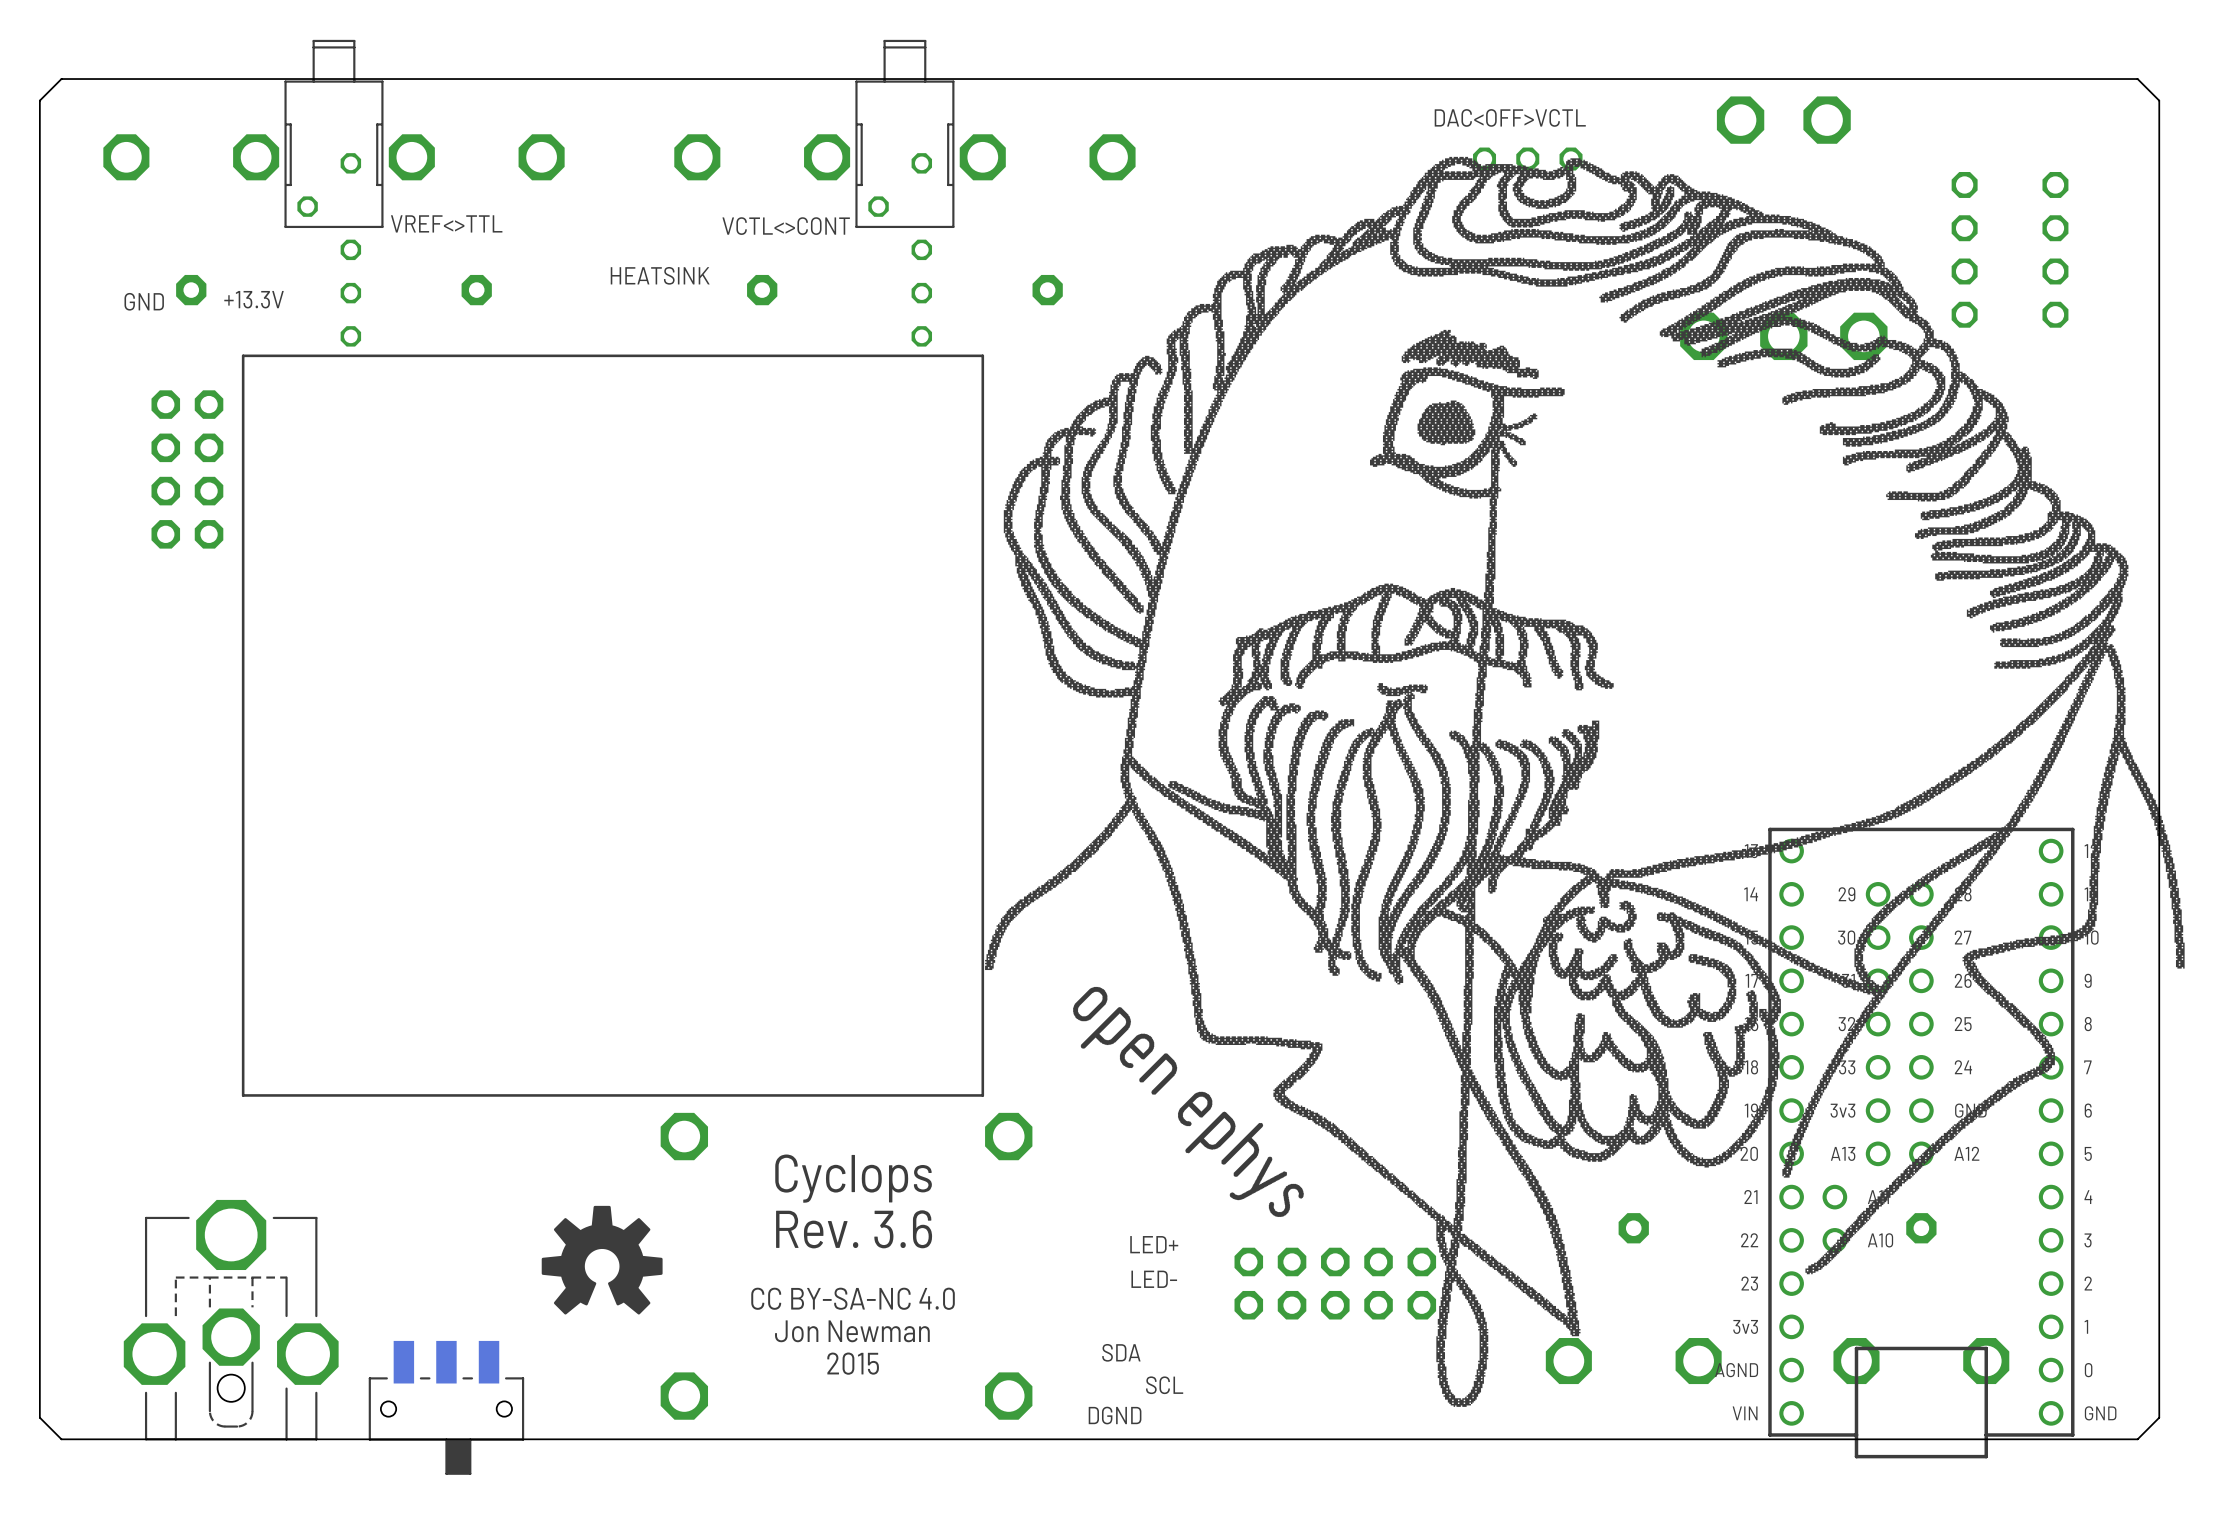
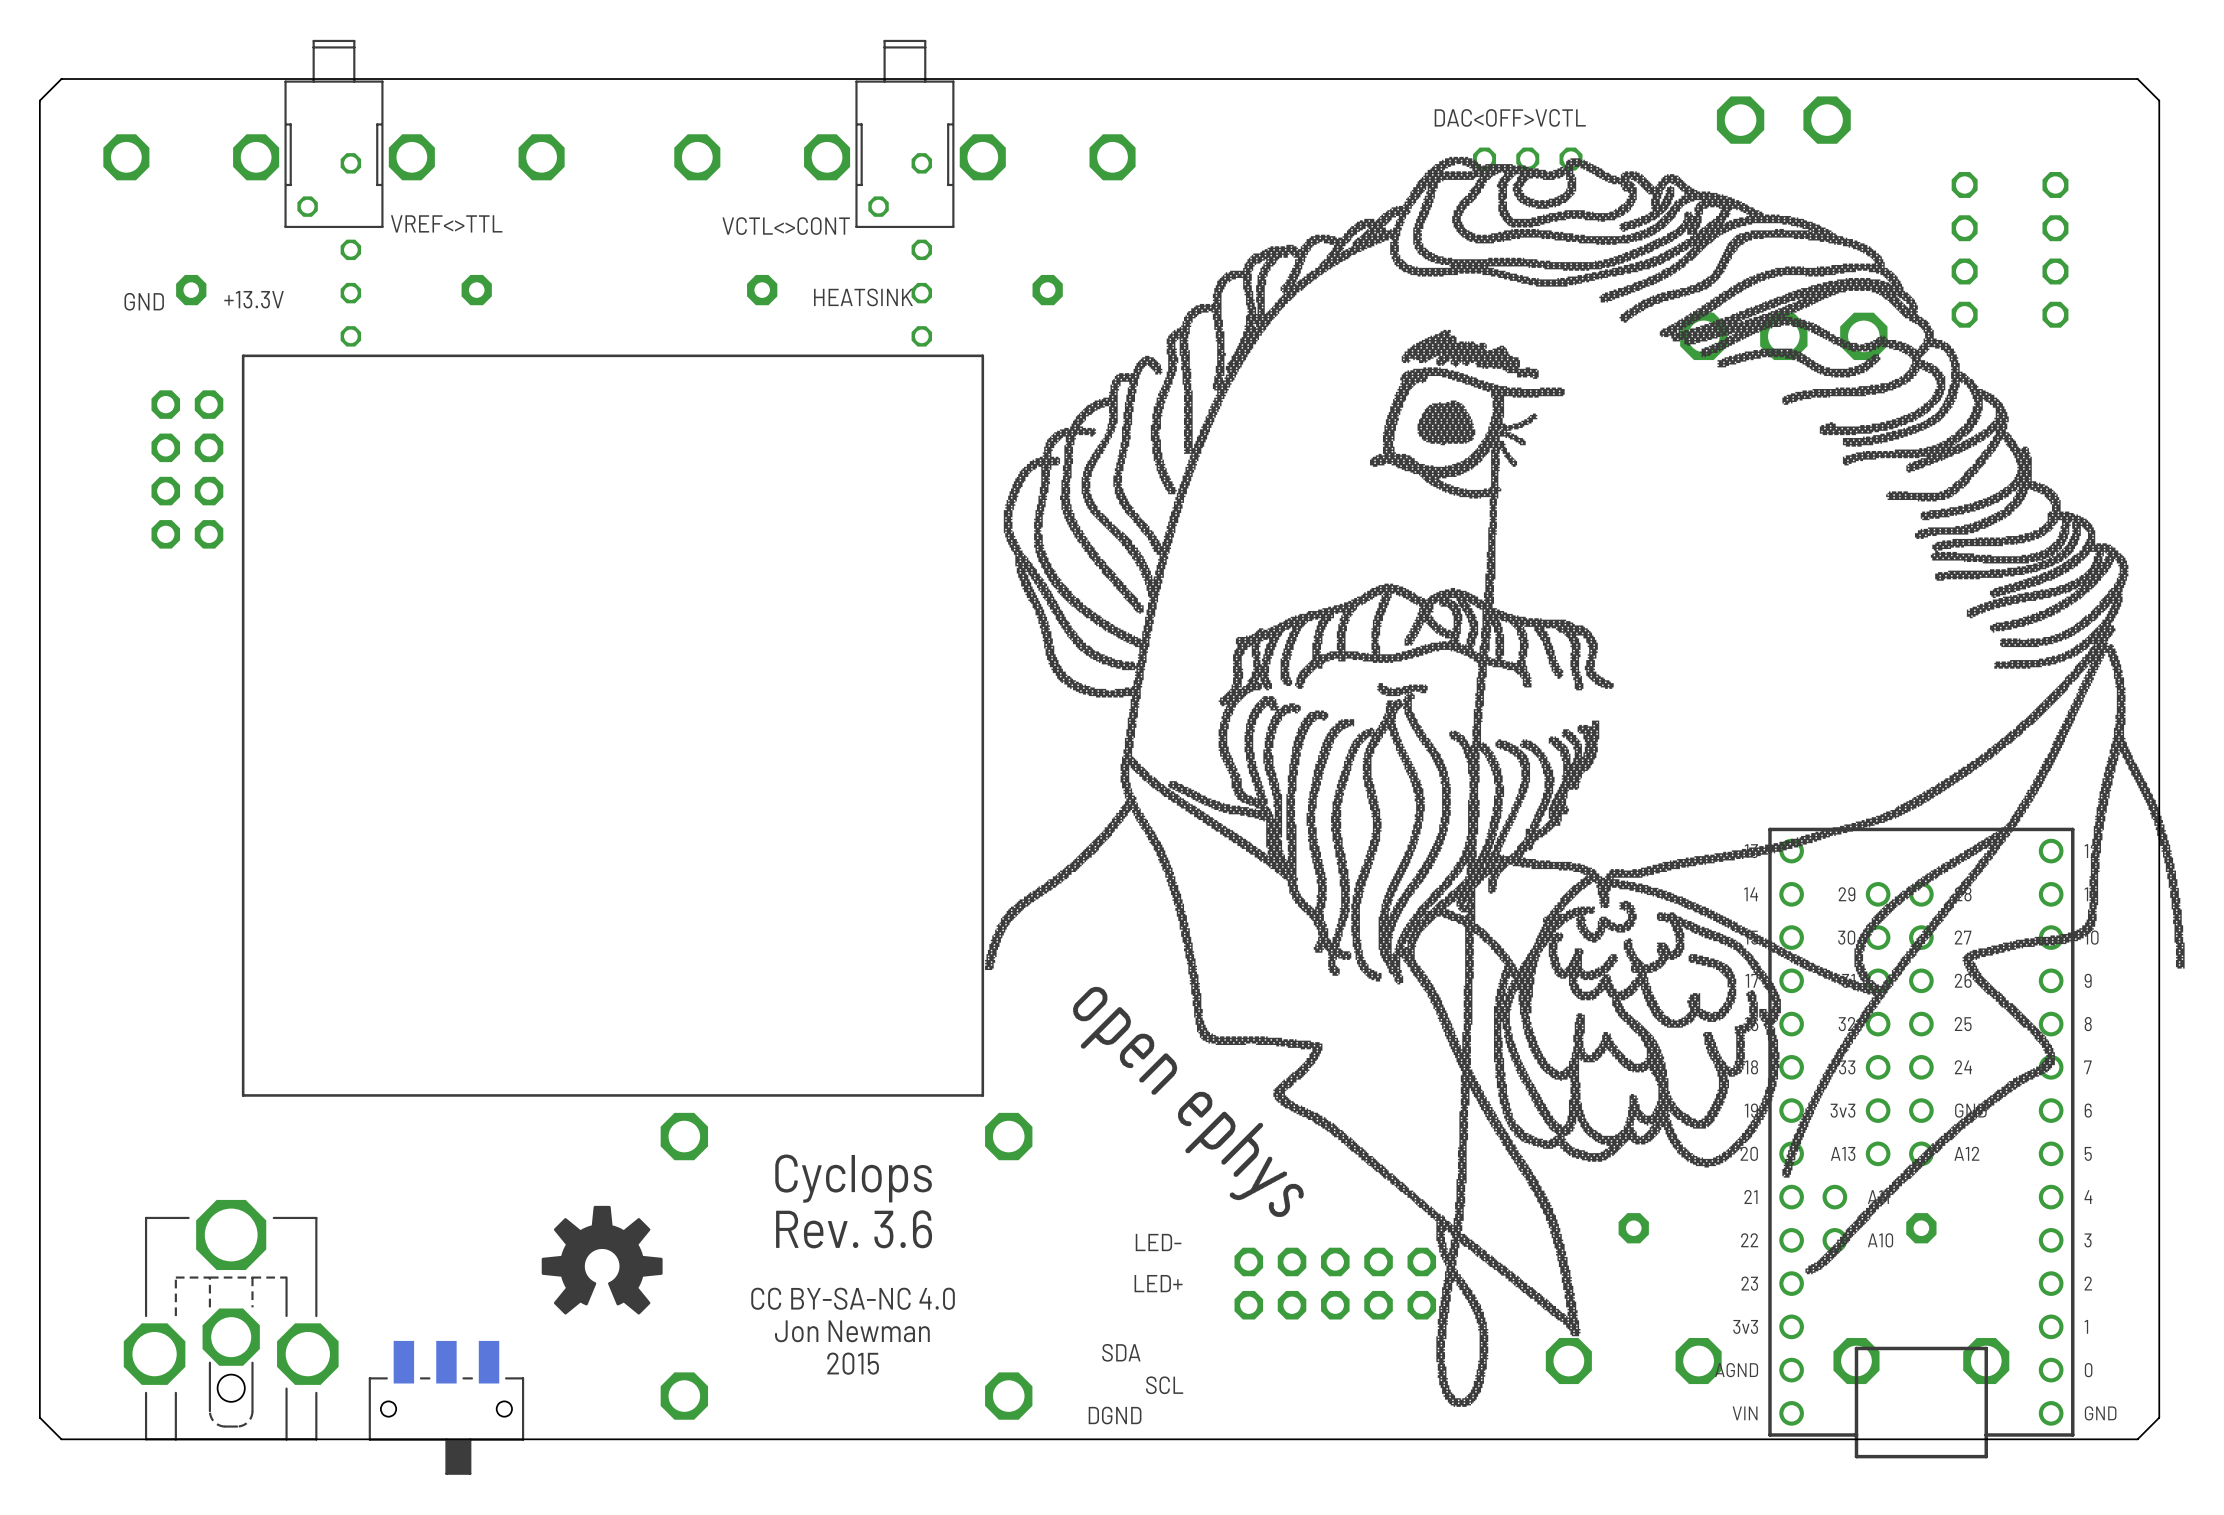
HEATSINK name position: HEATSINK (660, 275) -> HEATSINK (863, 297)
text position: LED+ (1154, 1244) -> LED+ (1158, 1283)
text position: LED- (1154, 1279) -> LED- (1158, 1242)

